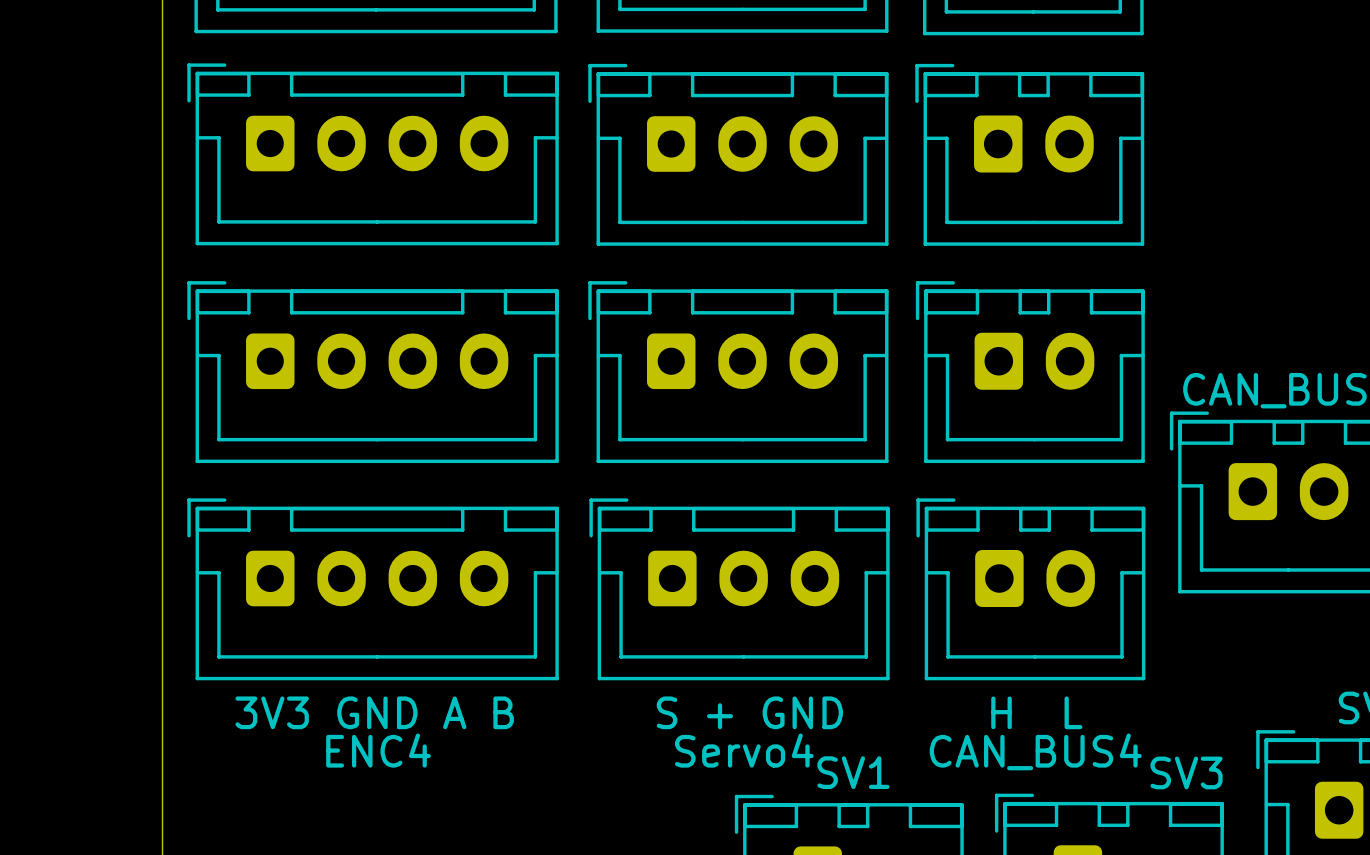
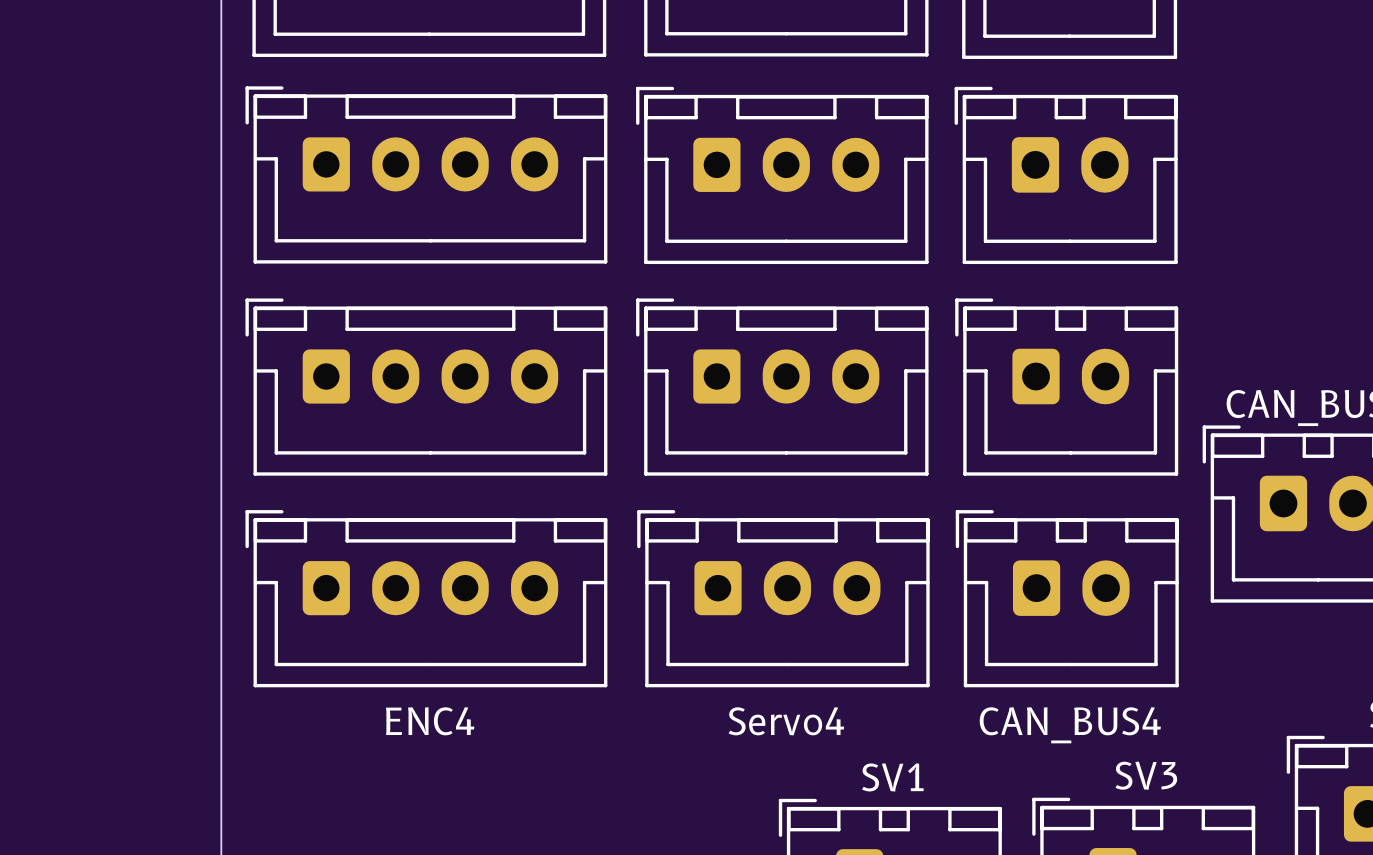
text: 3V3 GND A B (374, 712) -> none
text: S + GND (749, 712) -> none
text: H L (1036, 712) -> none
ENC4 name position: ENC4 (378, 750) -> ENC4 (430, 721)
Servo4 name position: Servo4 (744, 750) -> Servo4 (786, 721)
CAN_BUS4 name position: CAN_BUS4 (1035, 751) -> CAN_BUS4 (1070, 725)
SV3 name position: SV3 (1186, 772) -> SV3 (1146, 775)

